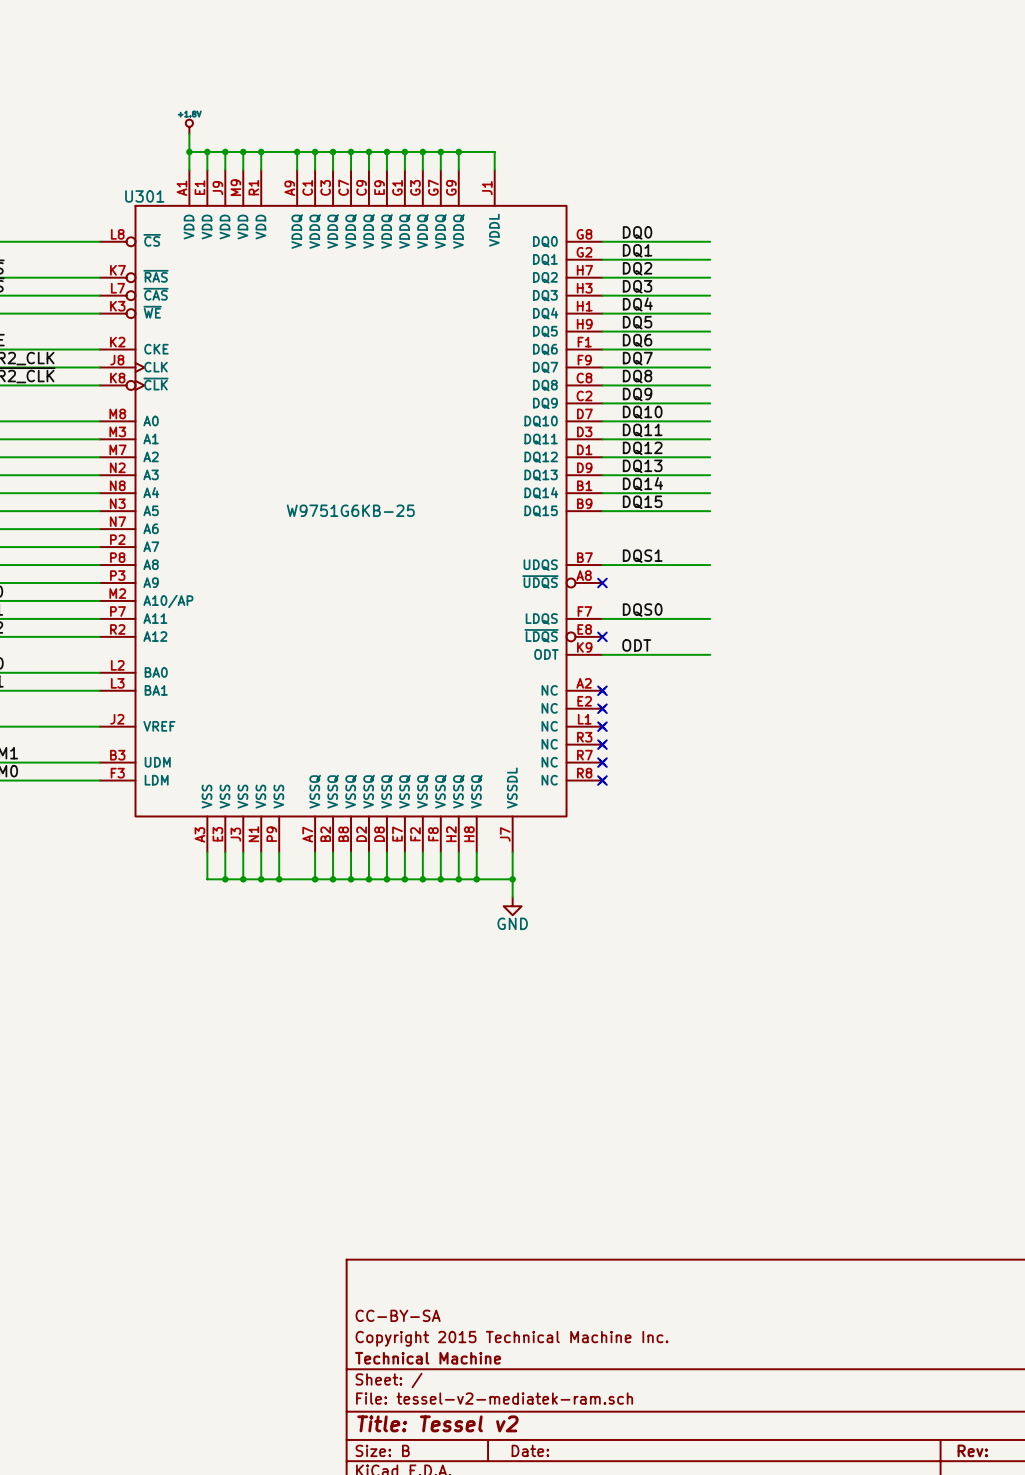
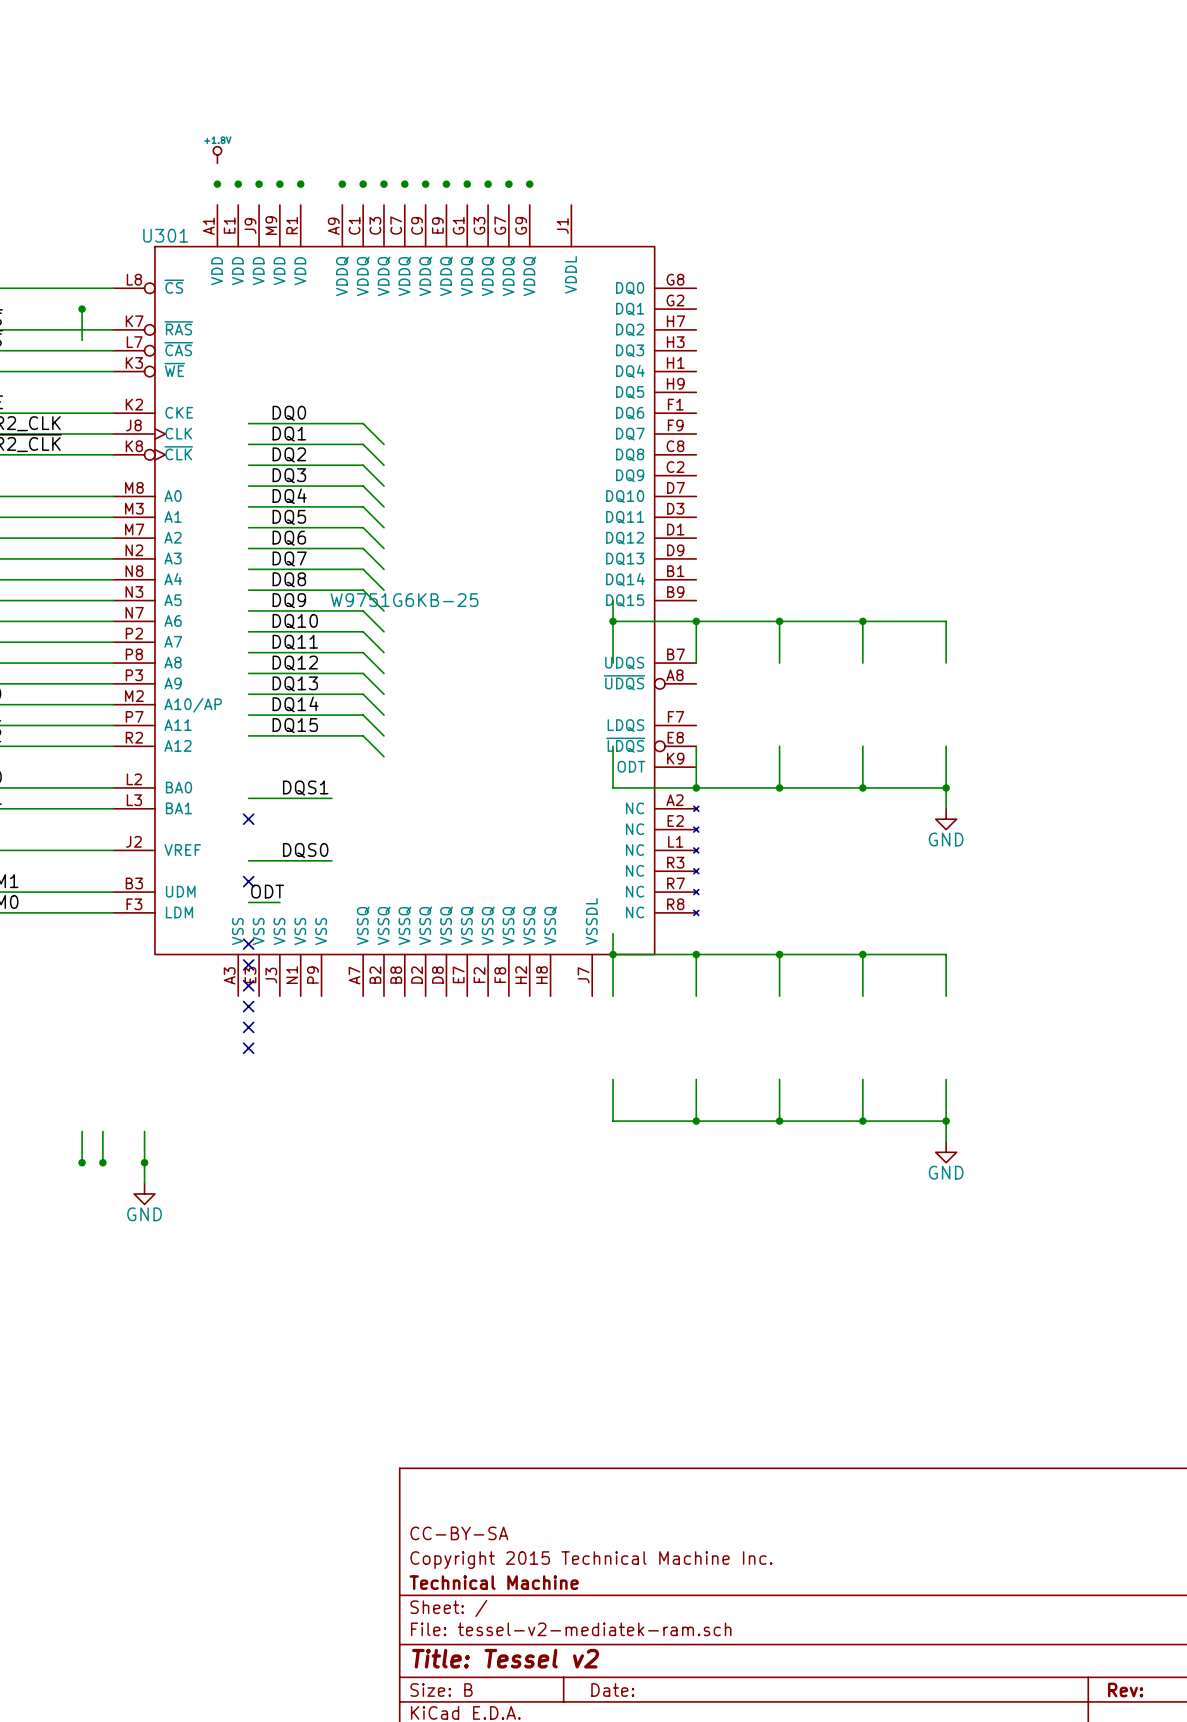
wire: (189, 134) (189, 169) -> none
wire: (189, 151) (494, 151) (494, 169) -> none
wire: (207, 151) (207, 169) -> none
wire: (225, 151) (225, 169) -> none
wire: (243, 151) (243, 169) -> none
wire: (261, 151) (261, 169) -> none
wire: (297, 151) (297, 169) -> none
wire: (315, 151) (315, 169) -> none
wire: (333, 151) (333, 169) -> none
wire: (351, 151) (351, 169) -> none
wire: (368, 151) (368, 169) -> none
wire: (386, 151) (386, 169) -> none
wire: (404, 151) (404, 169) -> none
wire: (422, 151) (422, 169) -> none
wire: (440, 151) (440, 169) -> none
wire: (458, 151) (458, 169) -> none
label: DQ0 (637, 232) -> none
wire: (602, 241) (710, 241) -> none
label: DQ1 (637, 250) -> none
wire: none -> (82, 309) (82, 340)
junction: none -> (82, 309)
wire: (602, 259) (710, 259) -> none
label: DQ2 (637, 268) -> none
wire: (602, 277) (710, 277) -> none
label: DQ3 (637, 286) -> none
wire: (602, 295) (710, 295) -> none
label: DQ4 (637, 304) -> none
wire: (602, 313) (710, 313) -> none
label: DQ5 (637, 322) -> none
wire: (602, 331) (710, 331) -> none
label: DQ6 (637, 340) -> none
label: none -> DQ0 (289, 413)
wire: (602, 349) (710, 349) -> none
wire: none -> (248, 423) (363, 423) (383, 444)
label: DQ7 (637, 358) -> none
label: none -> DQ1 (289, 434)
wire: (602, 367) (710, 367) -> none
wire: none -> (248, 444) (363, 444) (383, 465)
label: DQ8 (637, 376) -> none
label: none -> DQ2 (289, 454)
wire: (602, 385) (710, 385) -> none
wire: none -> (248, 465) (363, 465) (383, 486)
label: DQ9 (637, 394) -> none
label: none -> DQ3 (289, 475)
wire: (602, 403) (710, 403) -> none
wire: none -> (248, 486) (363, 486) (383, 506)
label: DQ10 (642, 412) -> none
label: none -> DQ4 (289, 496)
wire: (602, 421) (710, 421) -> none
wire: none -> (248, 506) (363, 506) (383, 527)
label: DQ11 (642, 430) -> none
label: none -> DQ5 (289, 517)
wire: (602, 439) (710, 439) -> none
wire: none -> (248, 527) (363, 527) (383, 548)
label: DQ12 (642, 448) -> none
label: none -> DQ6 (289, 538)
wire: (602, 457) (710, 457) -> none
wire: none -> (248, 548) (363, 548) (383, 569)
label: DQ13 (642, 466) -> none
label: none -> DQ7 (289, 559)
wire: (602, 475) (710, 475) -> none
wire: none -> (248, 569) (363, 569) (383, 590)
label: DQ14 (642, 484) -> none
label: none -> DQ8 (289, 579)
wire: (602, 493) (710, 493) -> none
wire: none -> (248, 590) (363, 590) (383, 610)
label: DQ15 (642, 502) -> none
label: none -> DQ9 (289, 600)
wire: none -> (613, 600) (613, 663)
wire: (602, 511) (710, 511) -> none
wire: none -> (248, 610) (363, 610) (383, 631)
label: none -> DQ10 (295, 621)
wire: none -> (613, 621) (946, 621) (946, 663)
junction: none -> (613, 621)
junction: none -> (696, 621)
wire: none -> (779, 621) (779, 663)
junction: none -> (779, 621)
wire: none -> (862, 621) (862, 663)
junction: none -> (862, 621)
wire: none -> (248, 631) (363, 631) (383, 652)
label: none -> DQ11 (295, 642)
wire: none -> (248, 652) (363, 652) (383, 673)
label: DQS1 (642, 556) -> none
label: none -> DQ12 (295, 663)
wire: (602, 565) (710, 565) -> (696, 663) (696, 621)
wire: none -> (248, 673) (363, 673) (383, 694)
no-connect mark: (602, 582) -> none
label: none -> DQ13 (295, 683)
wire: none -> (248, 694) (363, 694) (383, 715)
label: none -> DQ14 (295, 704)
wire: none -> (248, 715) (363, 715) (383, 735)
label: DQS0 (642, 610) -> none
wire: (602, 618) (710, 618) -> none
label: none -> DQ15 (295, 725)
wire: none -> (248, 735) (363, 735) (383, 756)
wire: none -> (613, 746) (613, 787) (946, 787)
wire: none -> (696, 746) (696, 787)
no-connect mark: (602, 636) -> none
wire: none -> (779, 746) (779, 787)
wire: none -> (862, 746) (862, 787)
wire: none -> (946, 746) (946, 808)
label: ODT (636, 645) -> none
wire: (602, 654) (710, 654) -> none
label: none -> DQS1 (305, 788)
junction: none -> (696, 787)
junction: none -> (779, 787)
junction: none -> (862, 787)
junction: none -> (946, 787)
wire: none -> (248, 798) (331, 798)
no-connect mark: (602, 690) -> none
no-connect mark: none -> (248, 819)
power symbol: none -> GND (946, 819)
no-connect mark: (602, 708) -> none
label: none -> DQS0 (305, 850)
no-connect mark: (602, 726) -> none
wire: none -> (248, 860) (331, 860)
no-connect mark: (602, 744) -> none
no-connect mark: none -> (248, 881)
label: none -> ODT (267, 891)
no-connect mark: (602, 762) -> none
wire: none -> (248, 902) (279, 902)
no-connect mark: (602, 780) -> none
wire: none -> (613, 933) (613, 996)
no-connect mark: none -> (248, 944)
wire: none -> (613, 954) (946, 954) (946, 996)
junction: none -> (613, 954)
wire: none -> (696, 954) (696, 996)
junction: none -> (696, 954)
wire: none -> (779, 954) (779, 996)
junction: none -> (779, 954)
wire: none -> (862, 954) (862, 996)
junction: none -> (862, 954)
no-connect mark: none -> (248, 964)
no-connect mark: none -> (248, 985)
wire: (207, 852) (207, 879) (512, 879) -> none
wire: (225, 852) (225, 879) -> none
wire: (243, 852) (243, 879) -> none
wire: (261, 852) (261, 879) -> none
wire: (279, 852) (279, 879) -> none
wire: (315, 852) (315, 879) -> none
wire: (333, 852) (333, 879) -> none
wire: (351, 852) (351, 879) -> none
wire: (368, 852) (368, 879) -> none
wire: (386, 852) (386, 879) -> none
wire: (404, 852) (404, 879) -> none
wire: (422, 852) (422, 879) -> none
wire: (440, 852) (440, 879) -> none
wire: (458, 852) (458, 879) -> none
wire: (476, 852) (476, 879) -> none
wire: (512, 852) (512, 897) -> none
no-connect mark: none -> (248, 1006)
no-connect mark: none -> (248, 1027)
junction: (225, 879) -> none
junction: (243, 879) -> none
junction: (261, 879) -> none
junction: (279, 879) -> none
junction: (315, 879) -> none
junction: (333, 879) -> none
junction: (351, 879) -> none
junction: (368, 879) -> none
junction: (386, 879) -> none
junction: (404, 879) -> none
junction: (422, 879) -> none
junction: (440, 879) -> none
junction: (458, 879) -> none
junction: (476, 879) -> none
junction: (512, 879) -> none
no-connect mark: none -> (248, 1048)
power symbol: GND (512, 906) -> none
wire: none -> (613, 1079) (613, 1121) (946, 1121)
wire: none -> (696, 1079) (696, 1121)
wire: none -> (779, 1079) (779, 1121)
wire: none -> (862, 1079) (862, 1121)
wire: none -> (946, 1079) (946, 1141)
junction: none -> (696, 1121)
junction: none -> (779, 1121)
junction: none -> (862, 1121)
junction: none -> (946, 1121)
wire: none -> (82, 1131) (82, 1162)
wire: none -> (102, 1131) (102, 1162)
wire: none -> (144, 1131) (144, 1183)
power symbol: none -> GND (946, 1152)
junction: none -> (82, 1162)
junction: none -> (102, 1162)
junction: none -> (144, 1162)
power symbol: none -> GND (144, 1193)

